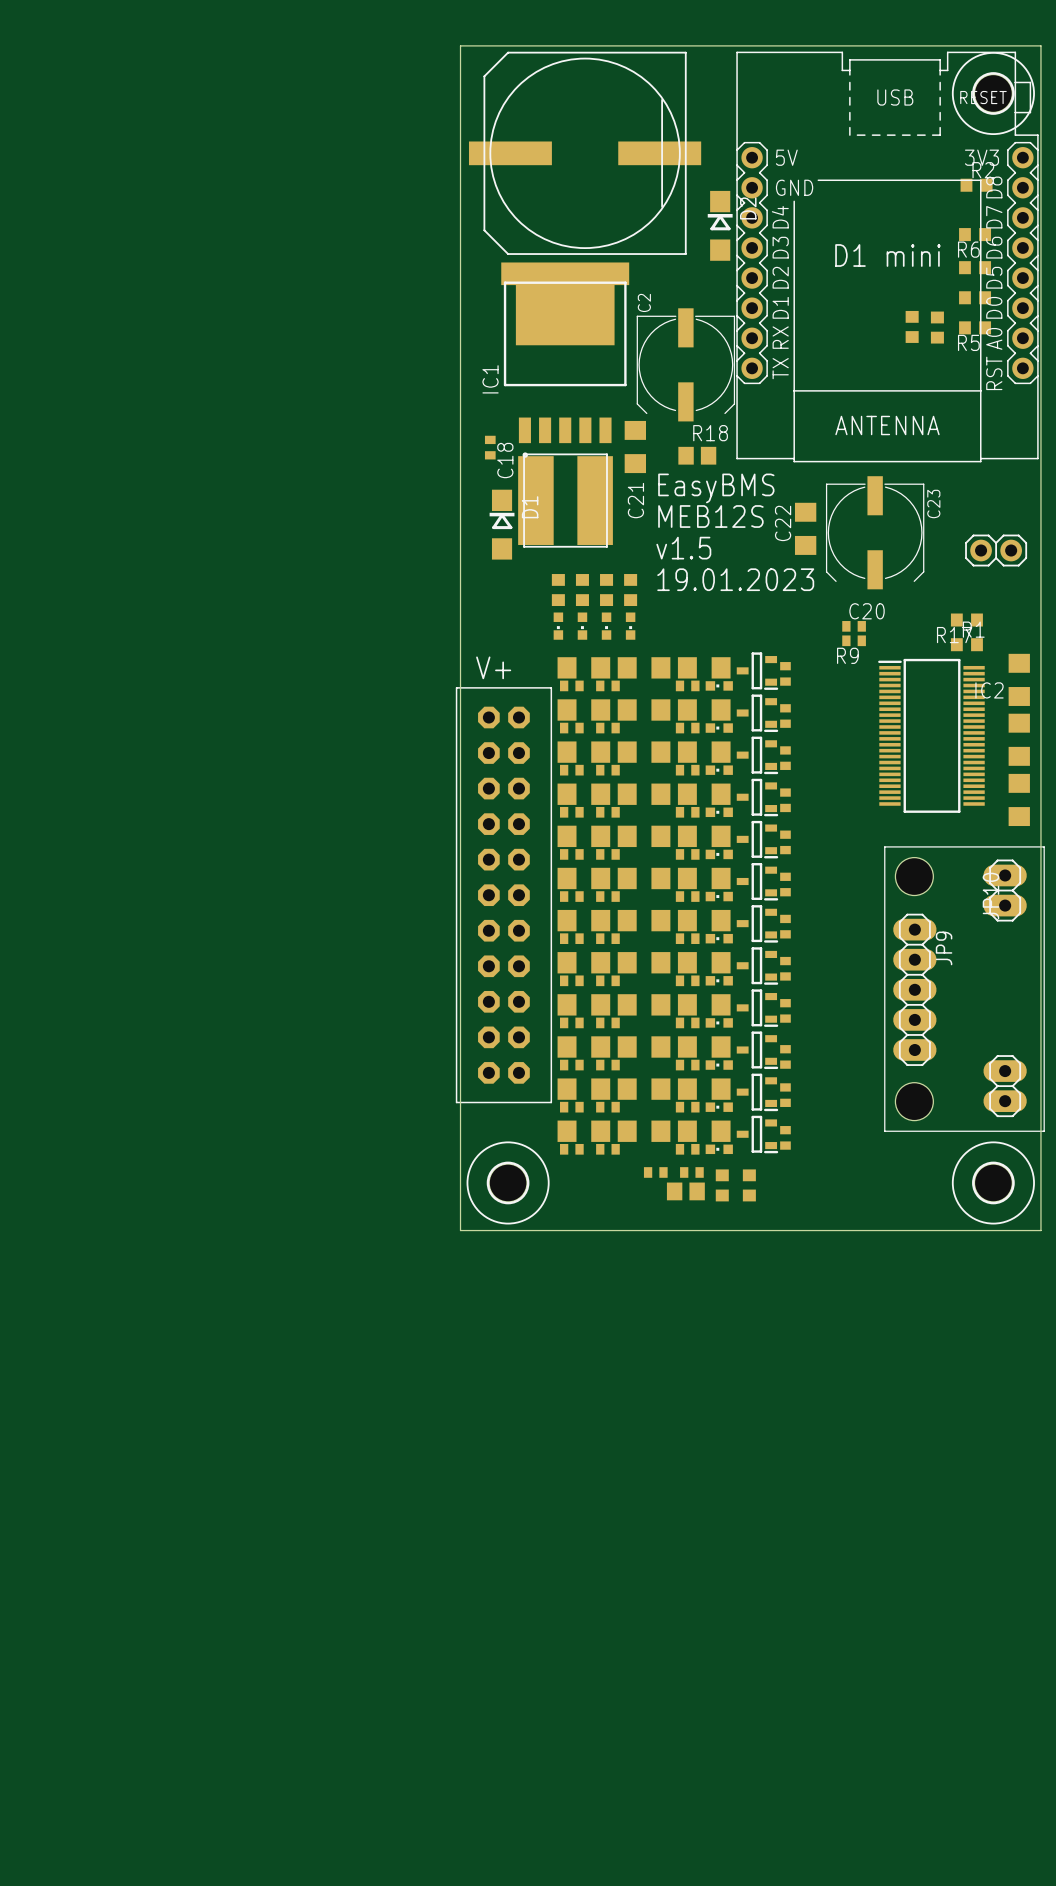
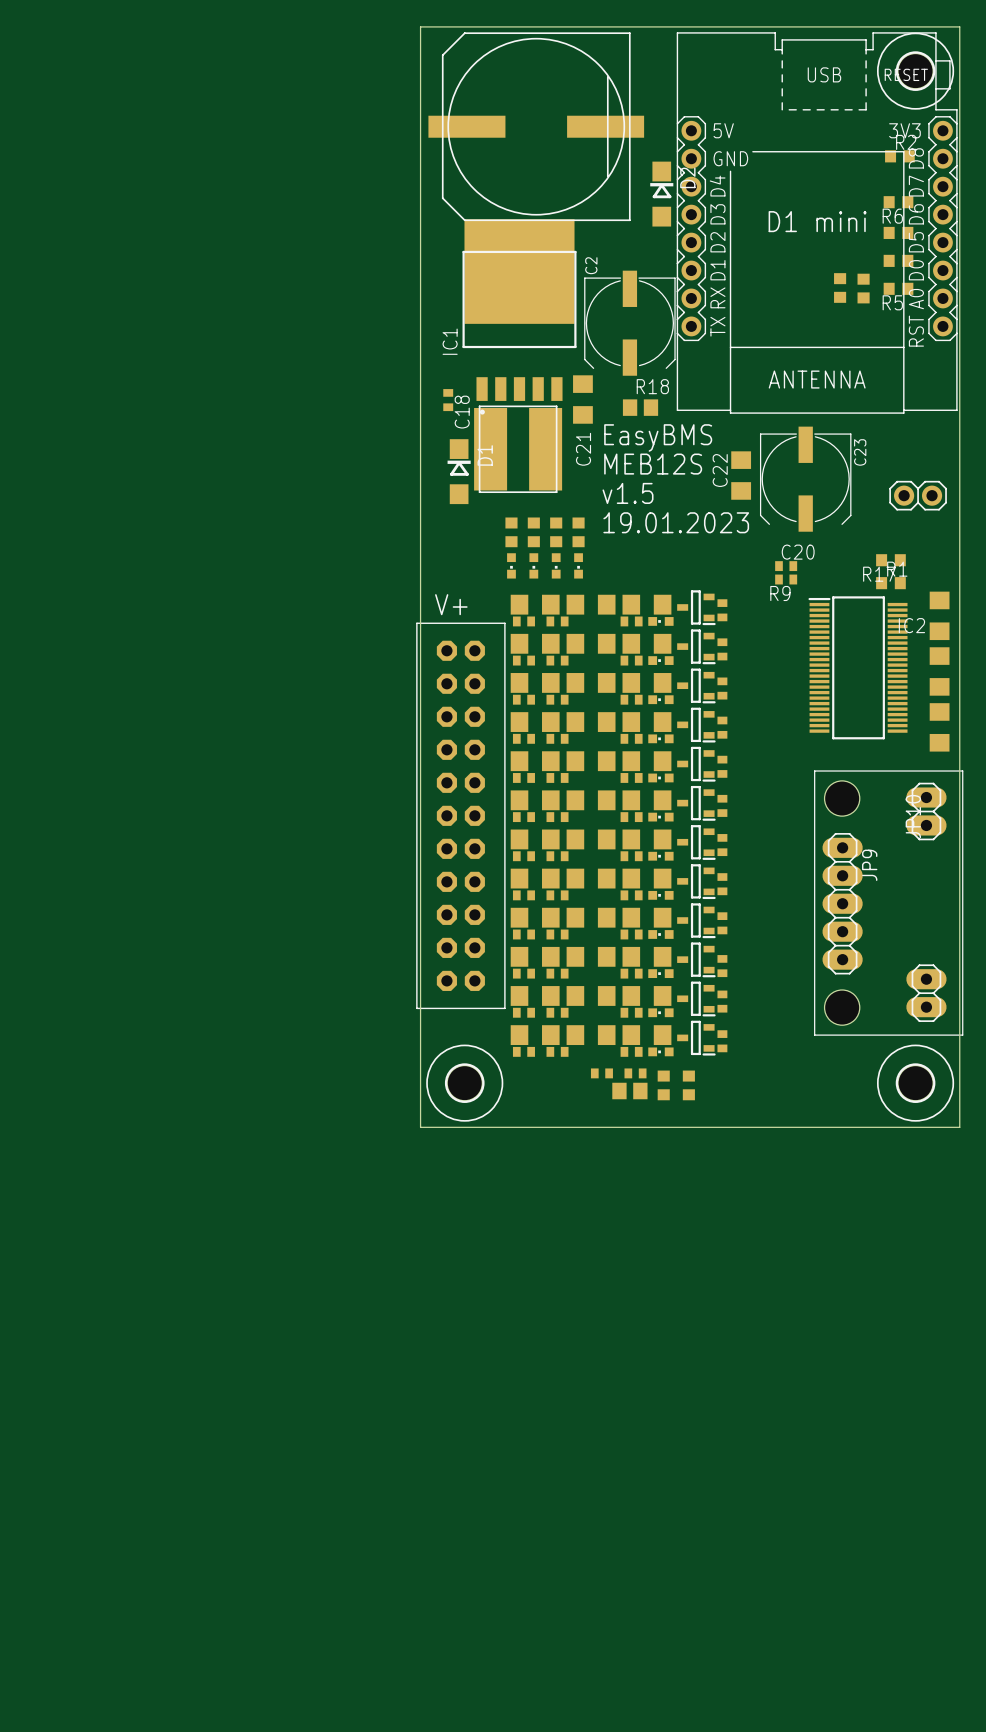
IC1 footprint: [501, 262, 630, 458] -> [462, 219, 577, 415]

